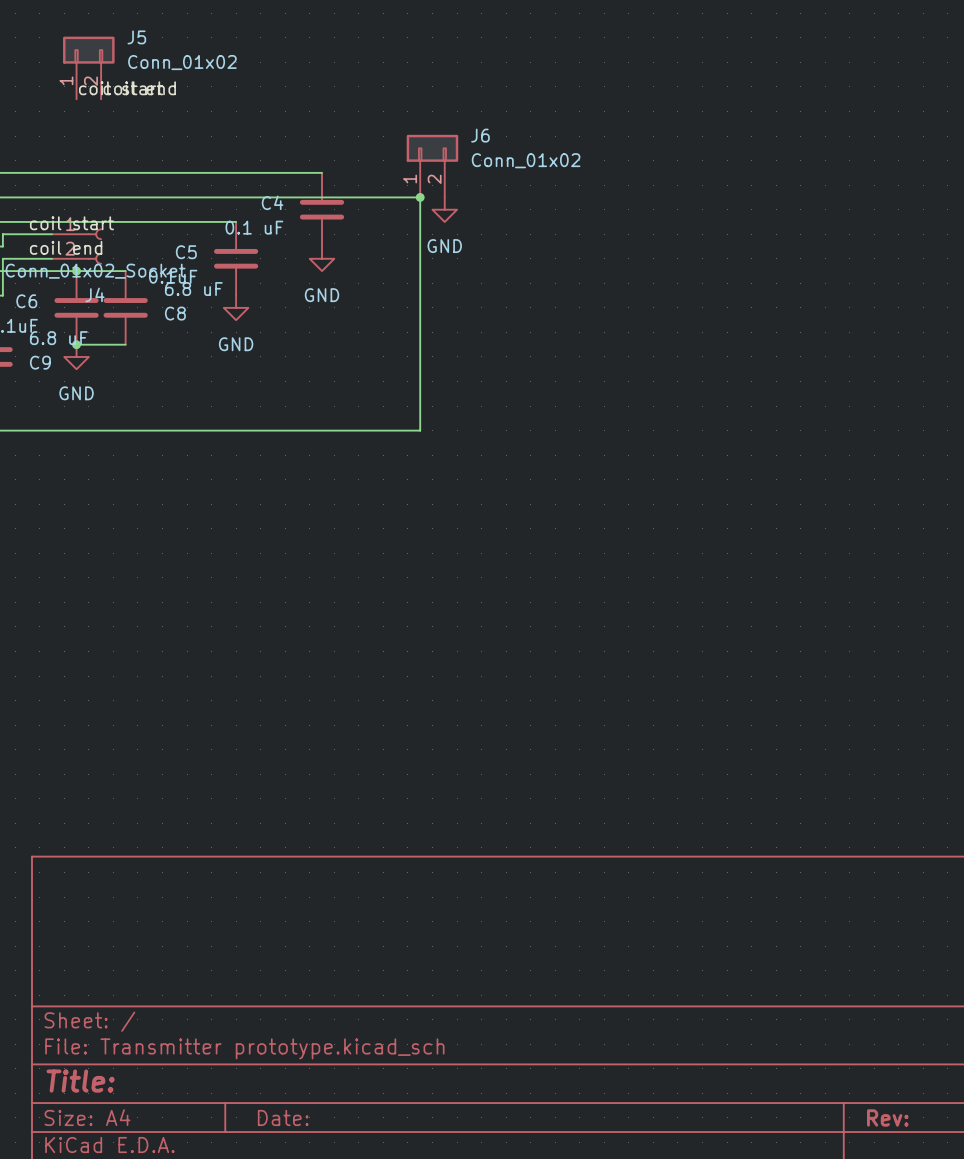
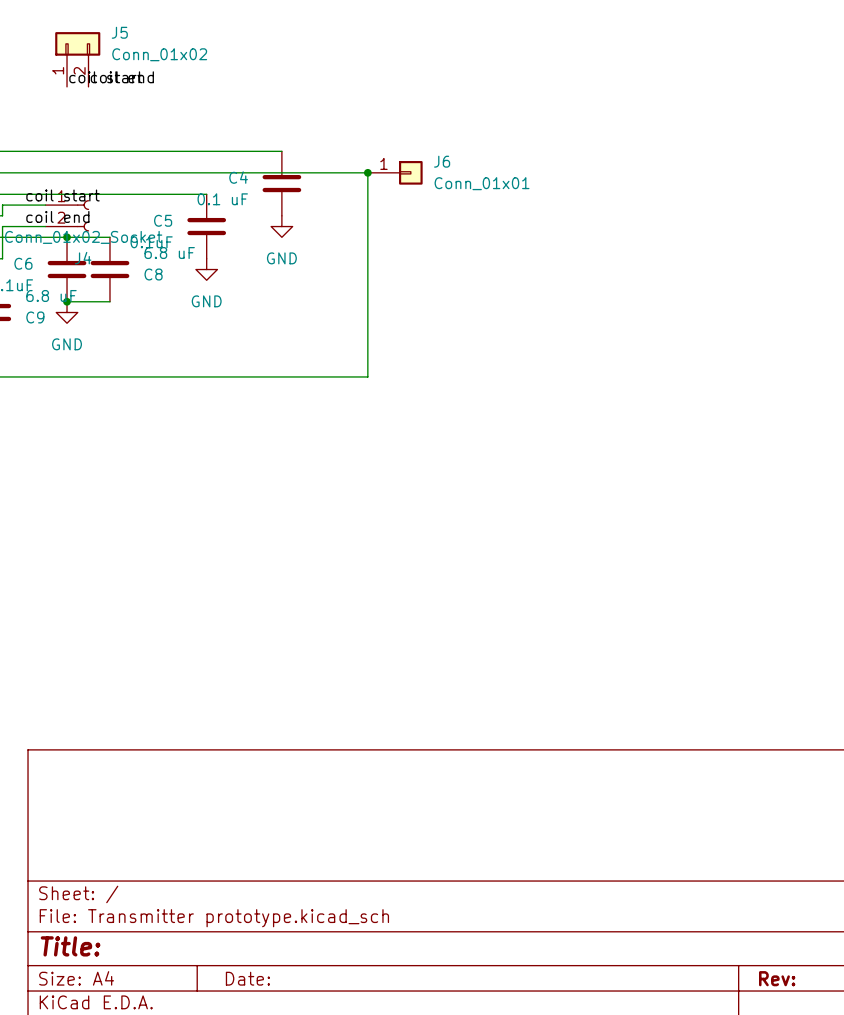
J6 symbol: [406, 134, 459, 198] -> [367, 161, 423, 185]
J6 value: Conn_01x02 (526, 160) -> Conn_01x01 (482, 183)
power symbol: GND (444, 209) -> none

